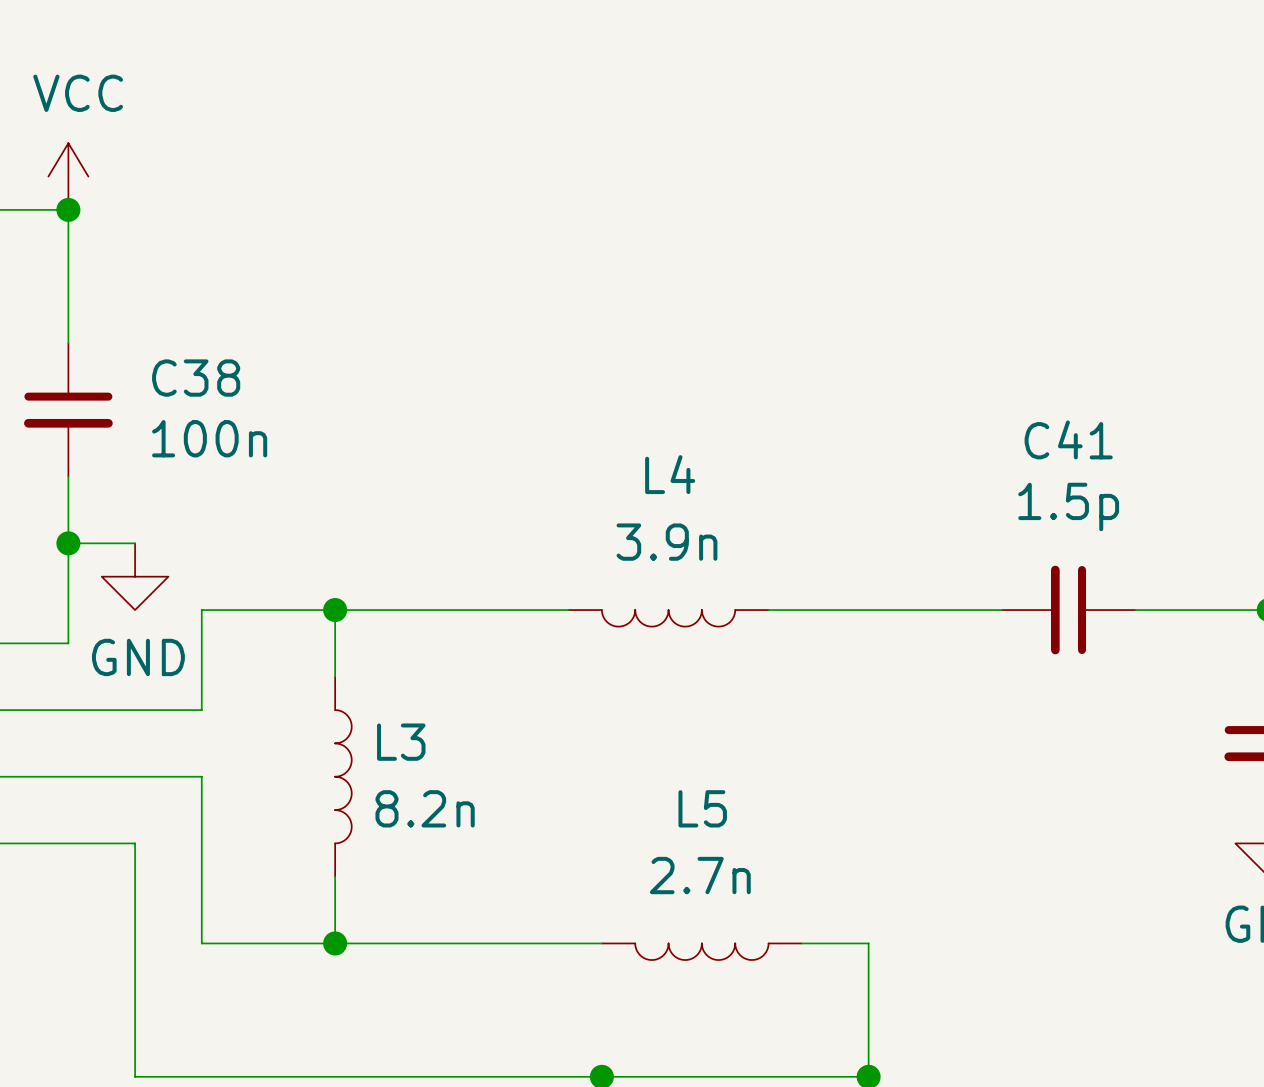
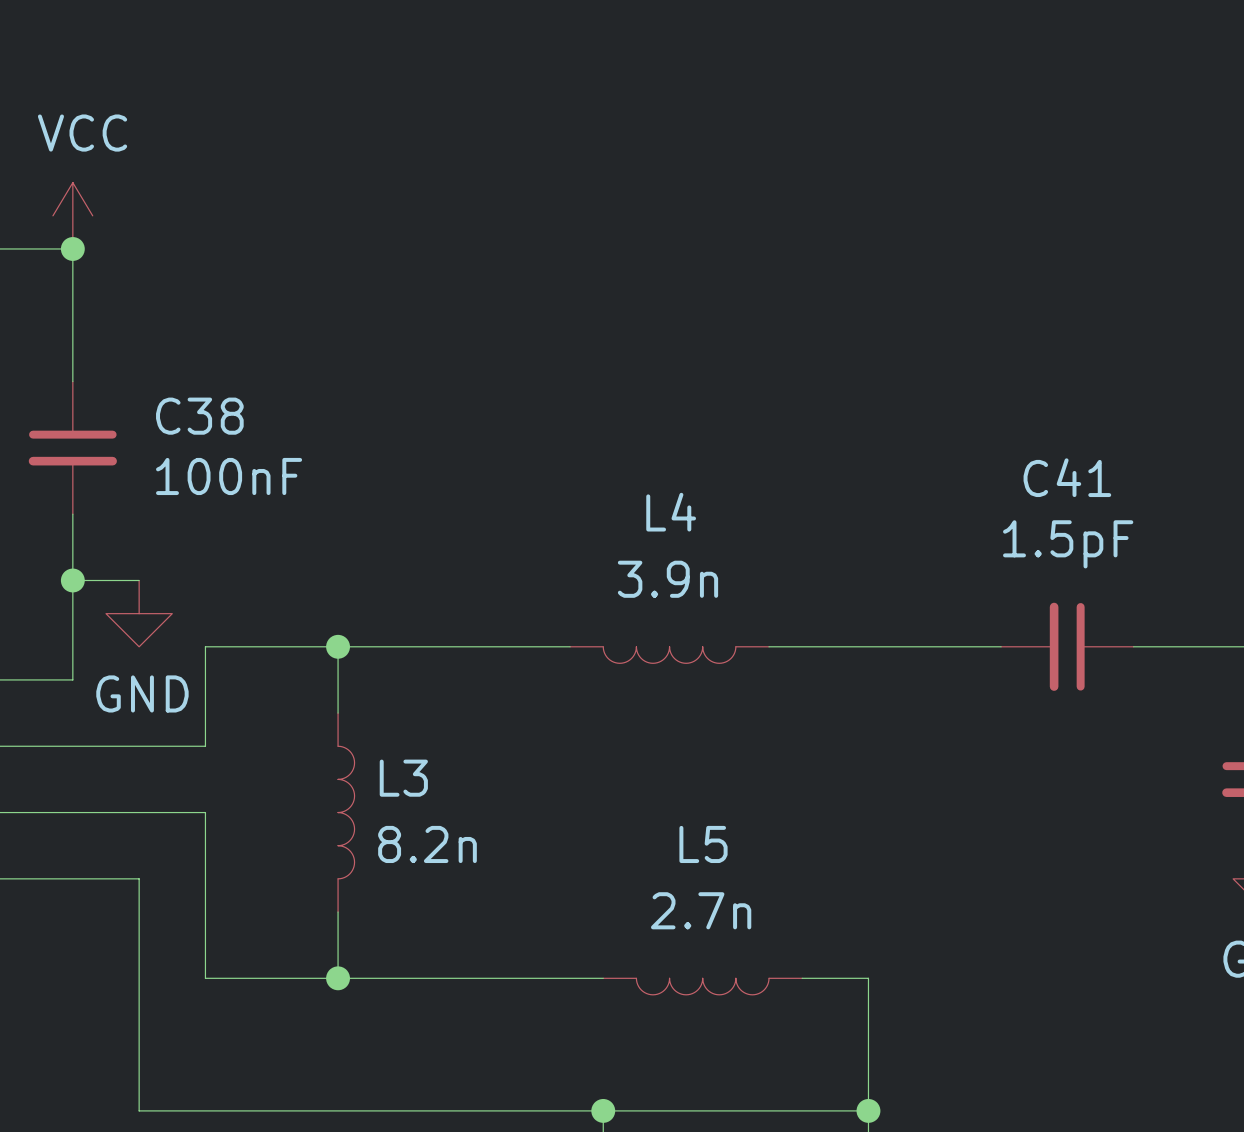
C38 value: 100n (209, 438) -> 100nF (229, 476)
C41 value: 1.5p (1068, 506) -> 1.5pF (1068, 544)

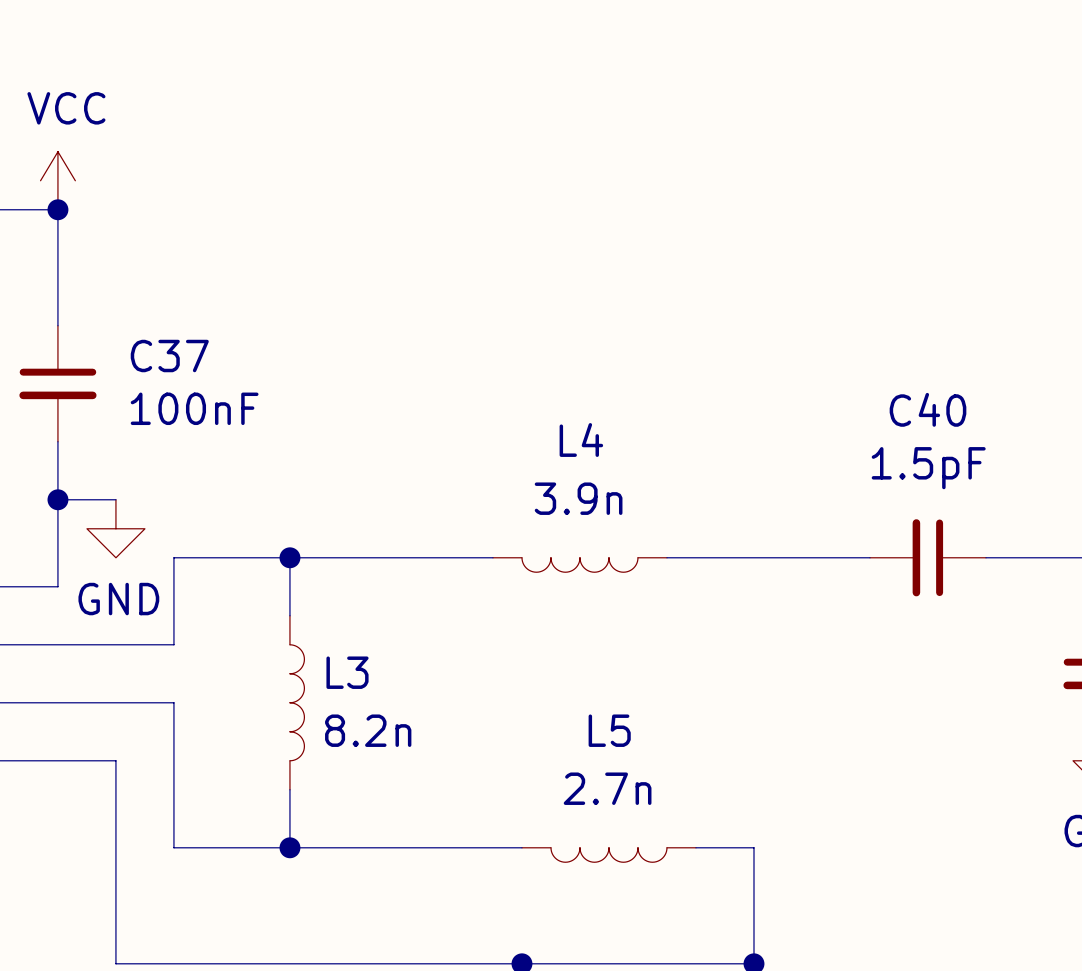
C38 name: C38 (199, 416) -> C37 (169, 356)
C41 name: C41 (1067, 477) -> C40 (928, 409)

